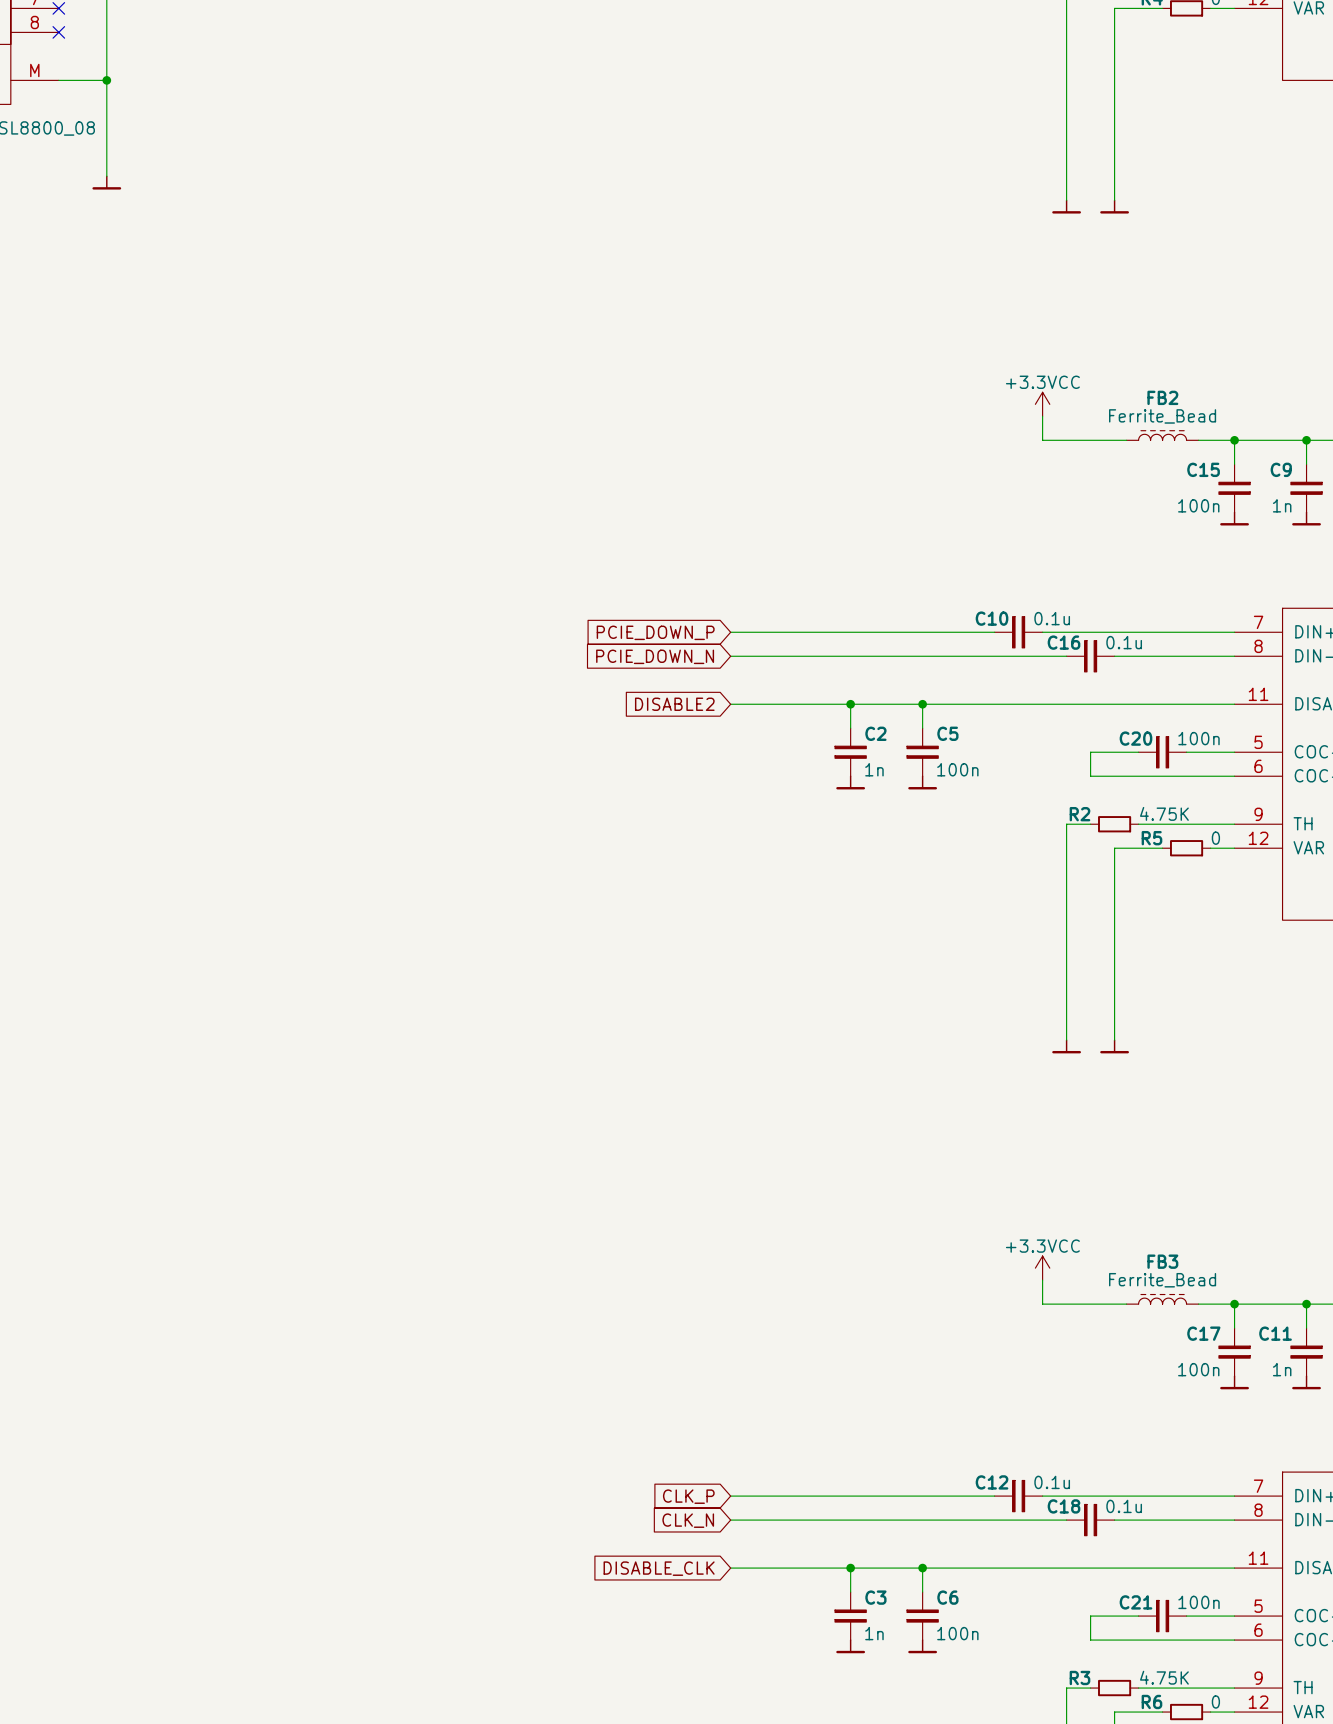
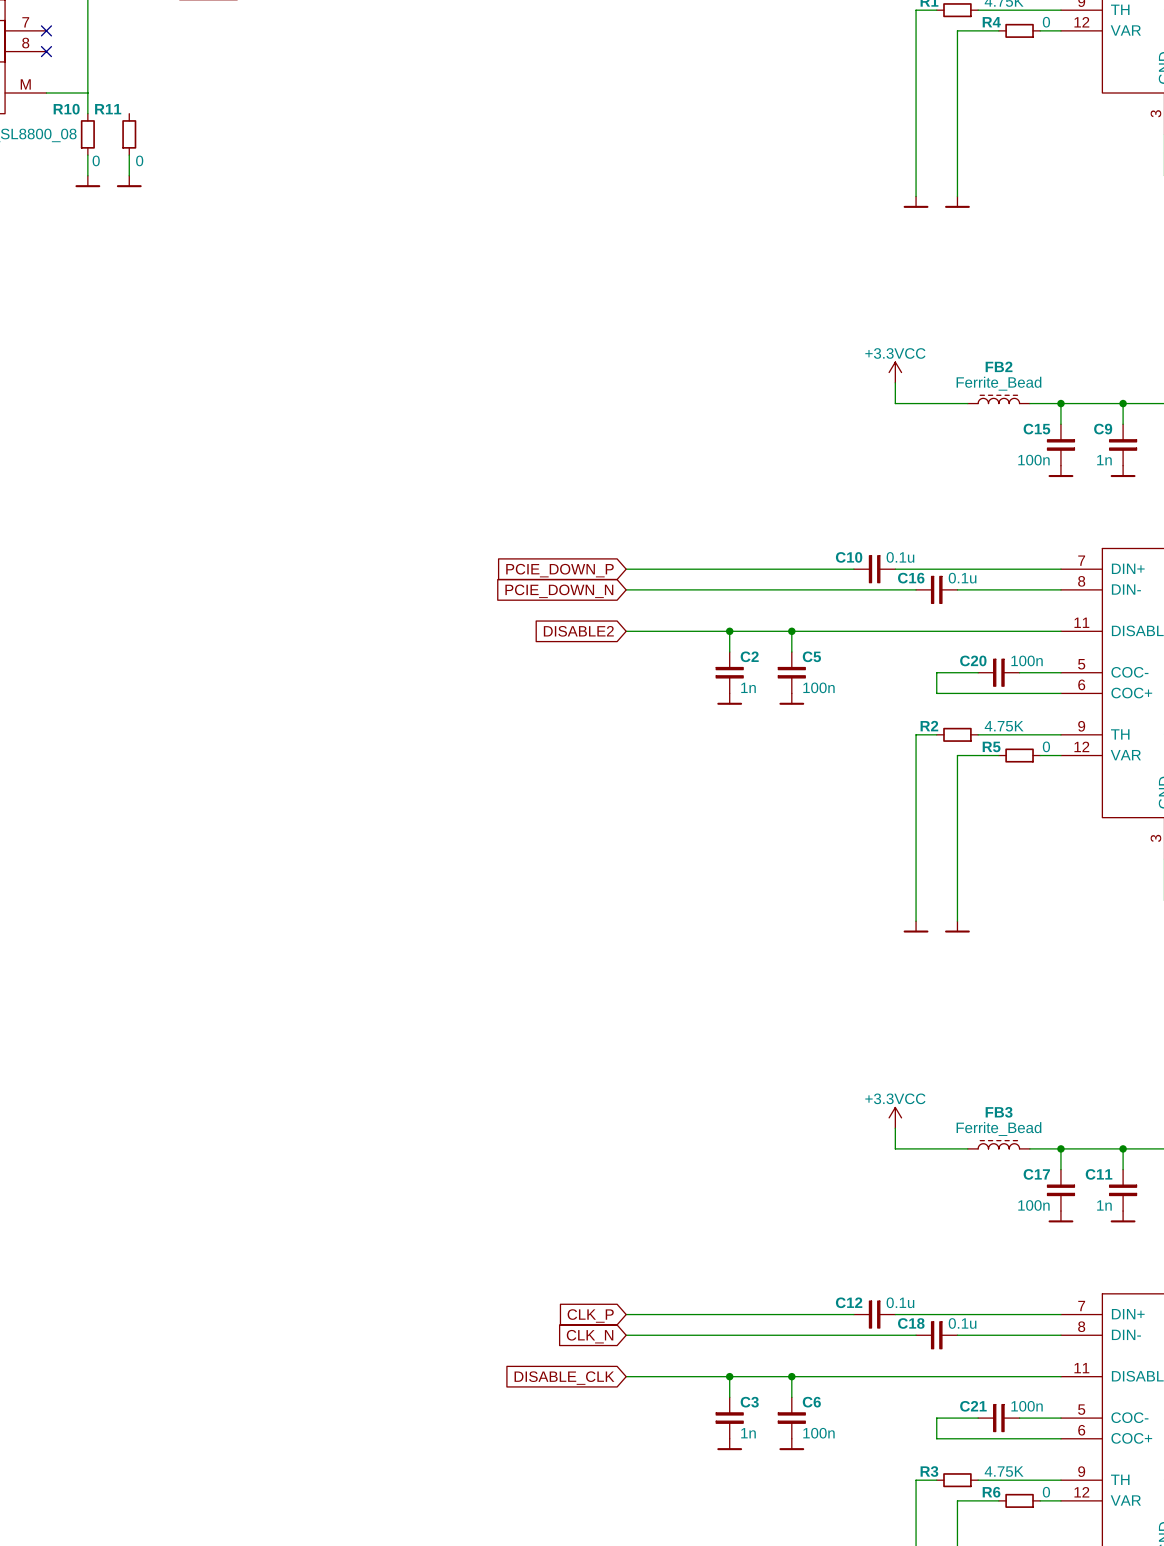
junction: (106, 80) -> none
wire: (106, 104) (106, 152) -> none
R10: none -> 0 (87, 134)
R11: none -> 0 (129, 134)
wire: none -> (129, 155) (129, 175)
power symbol: none -> (129, 181)

